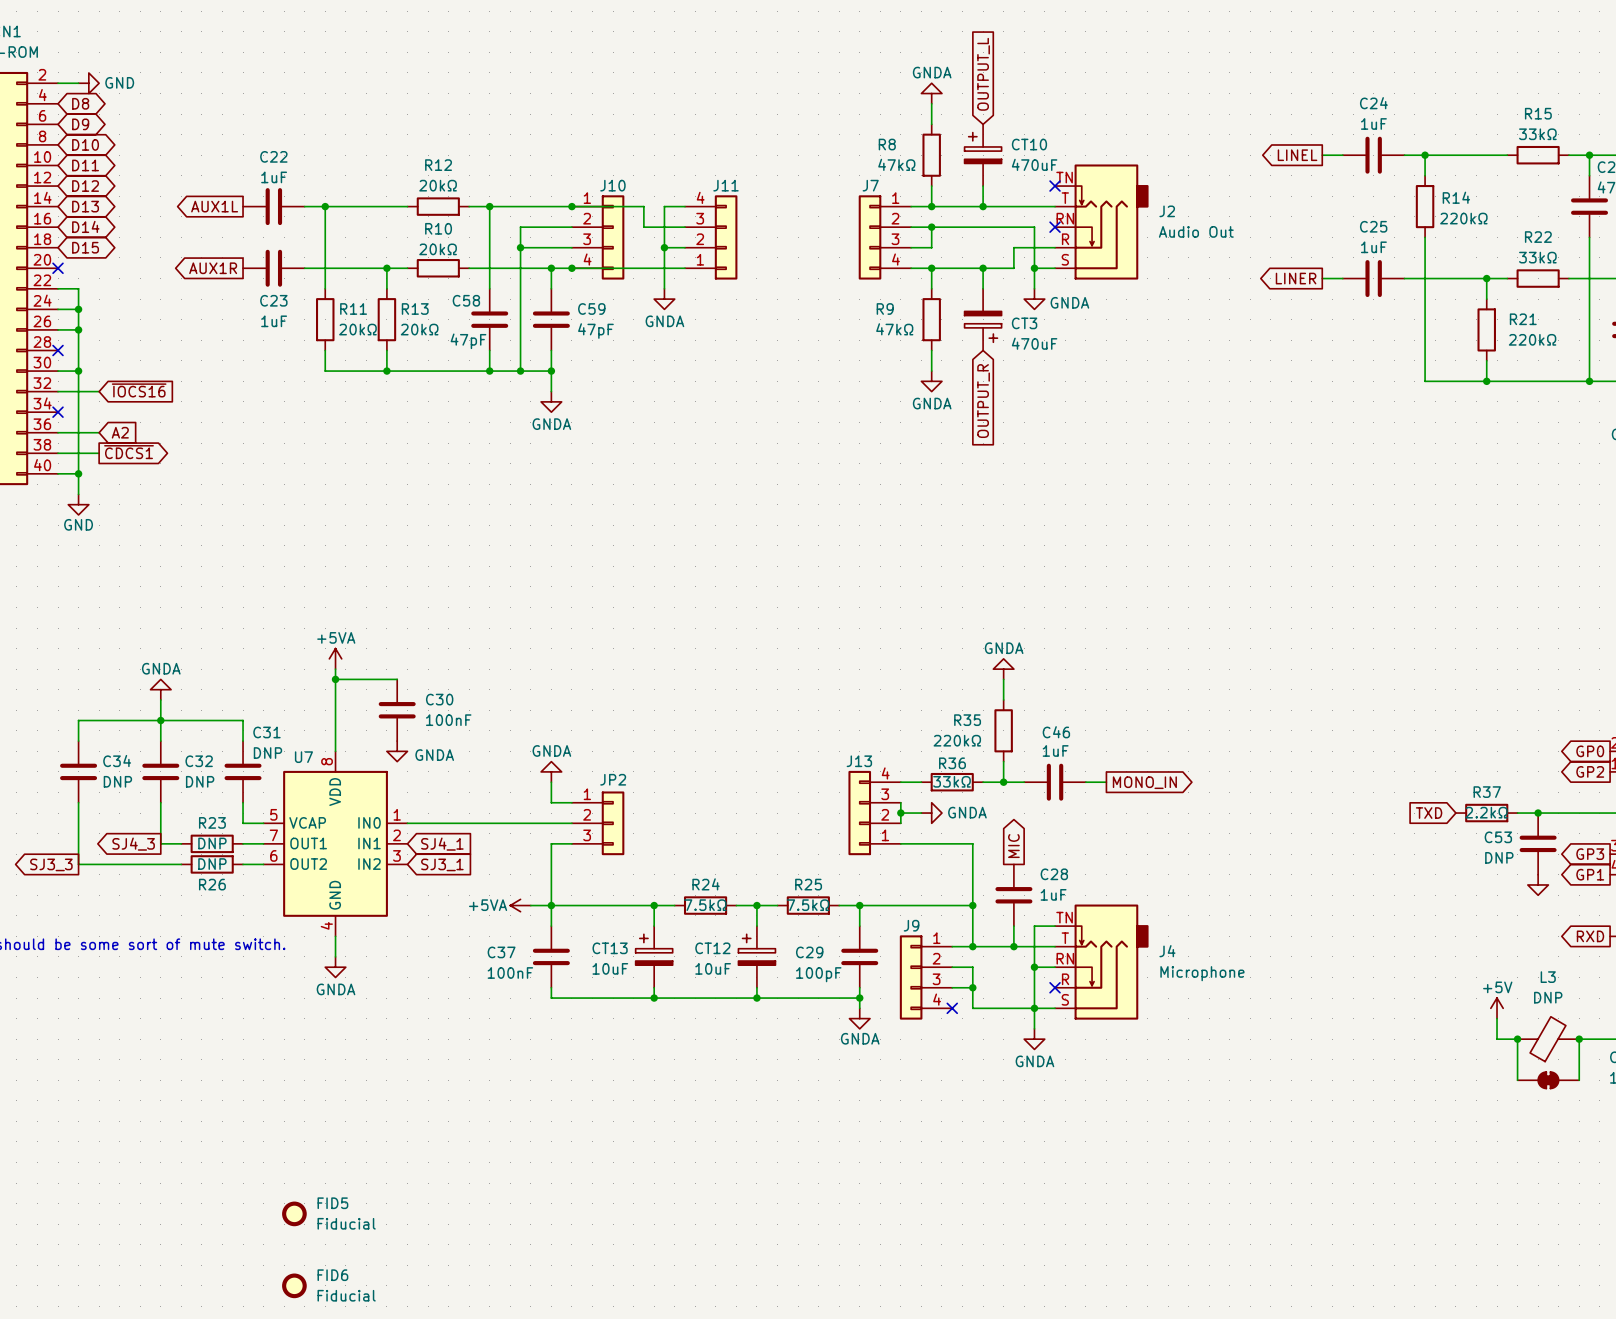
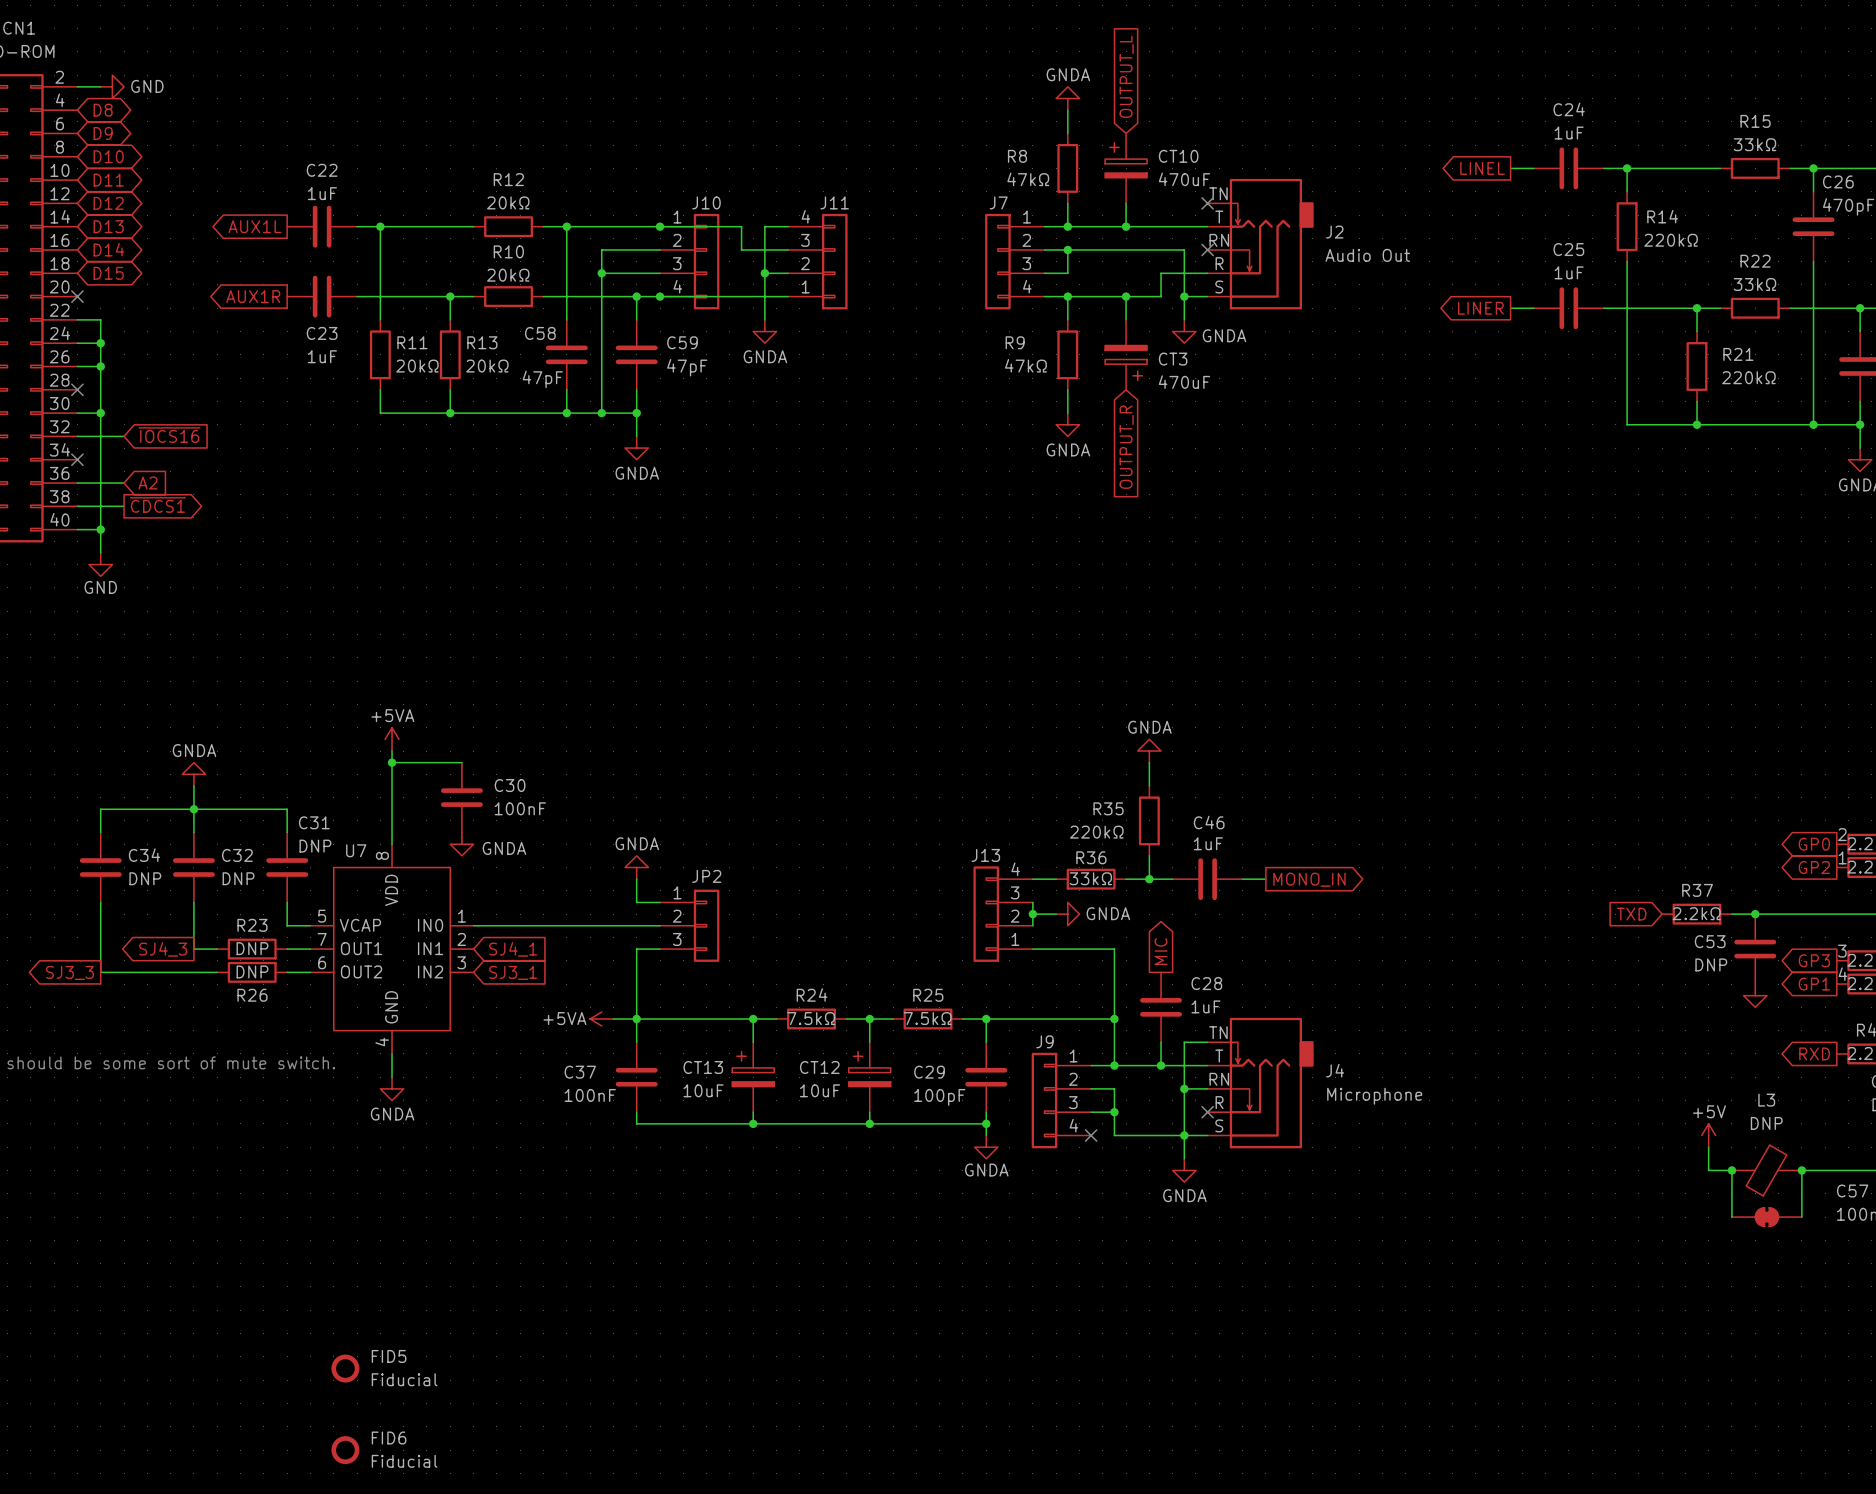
U7 symbol: [263, 751, 408, 937] -> [310, 844, 474, 1054]

